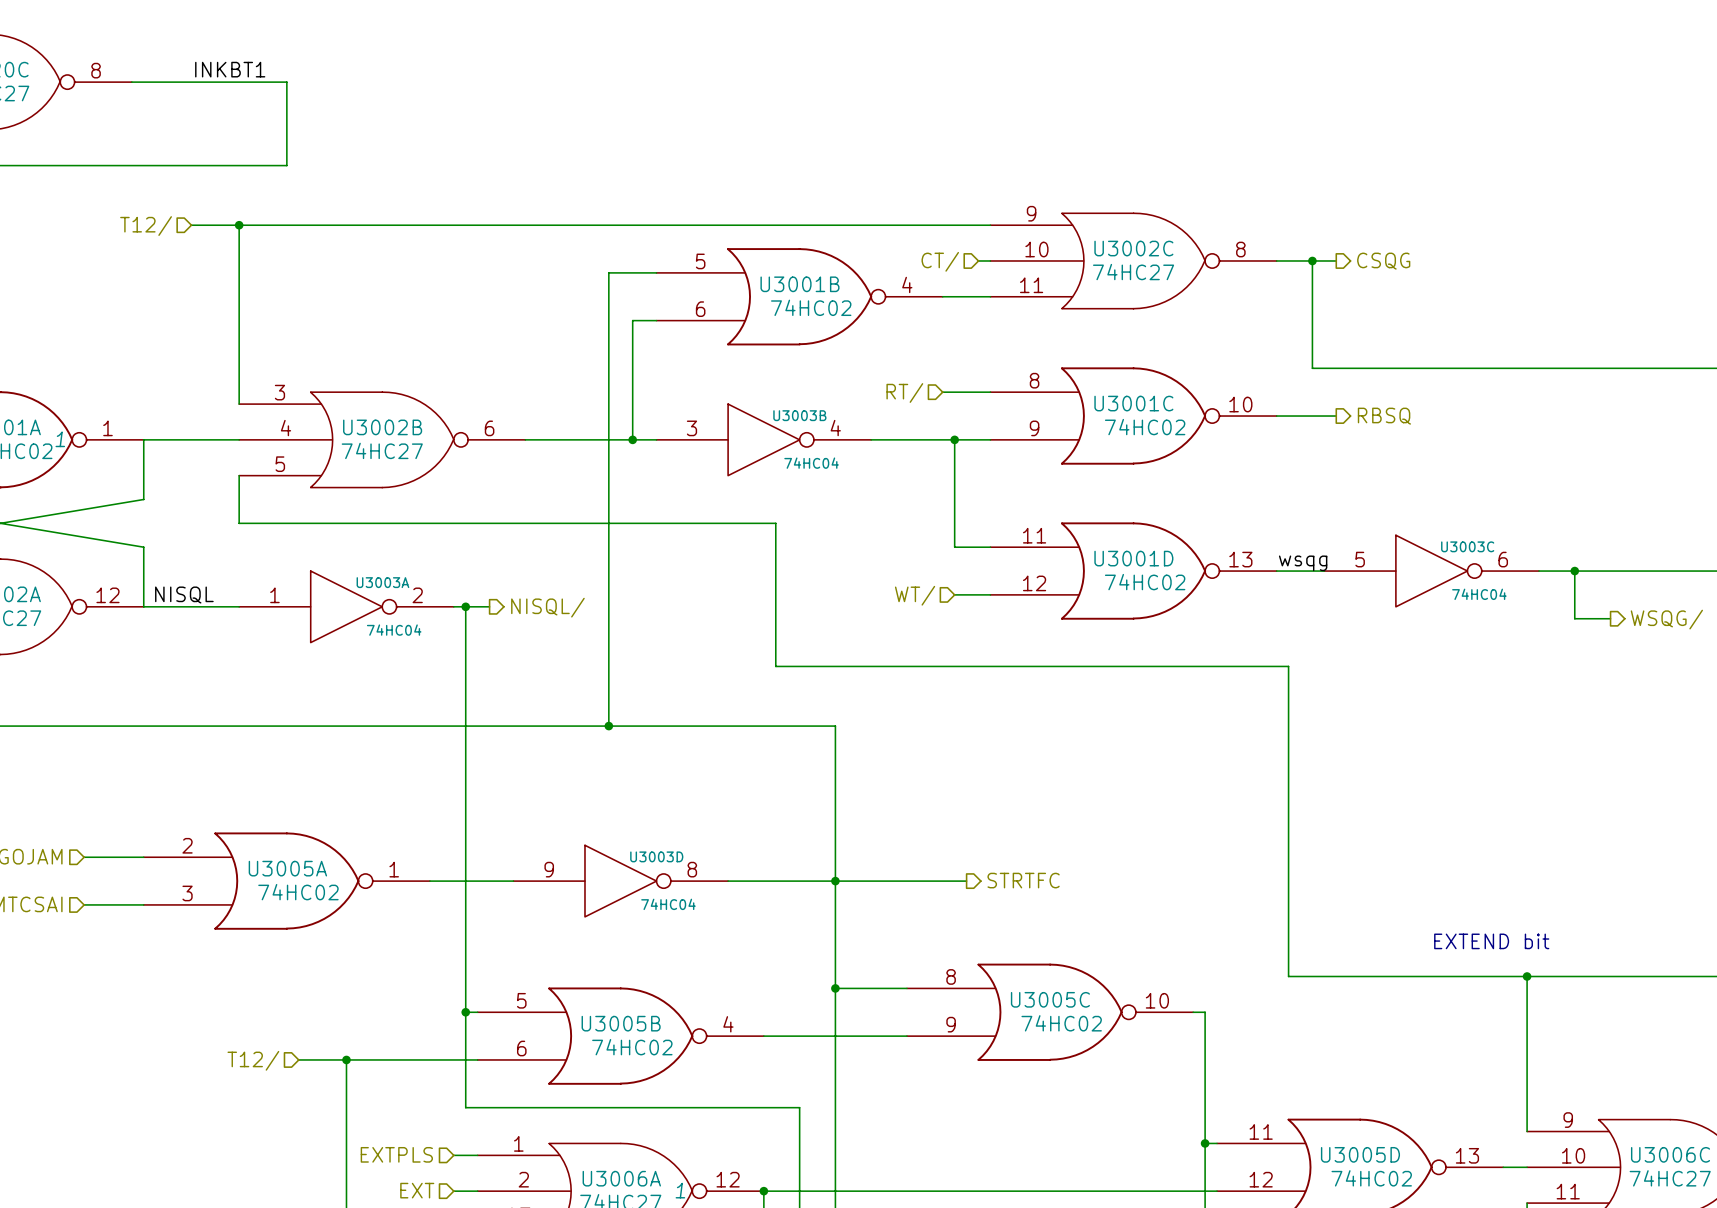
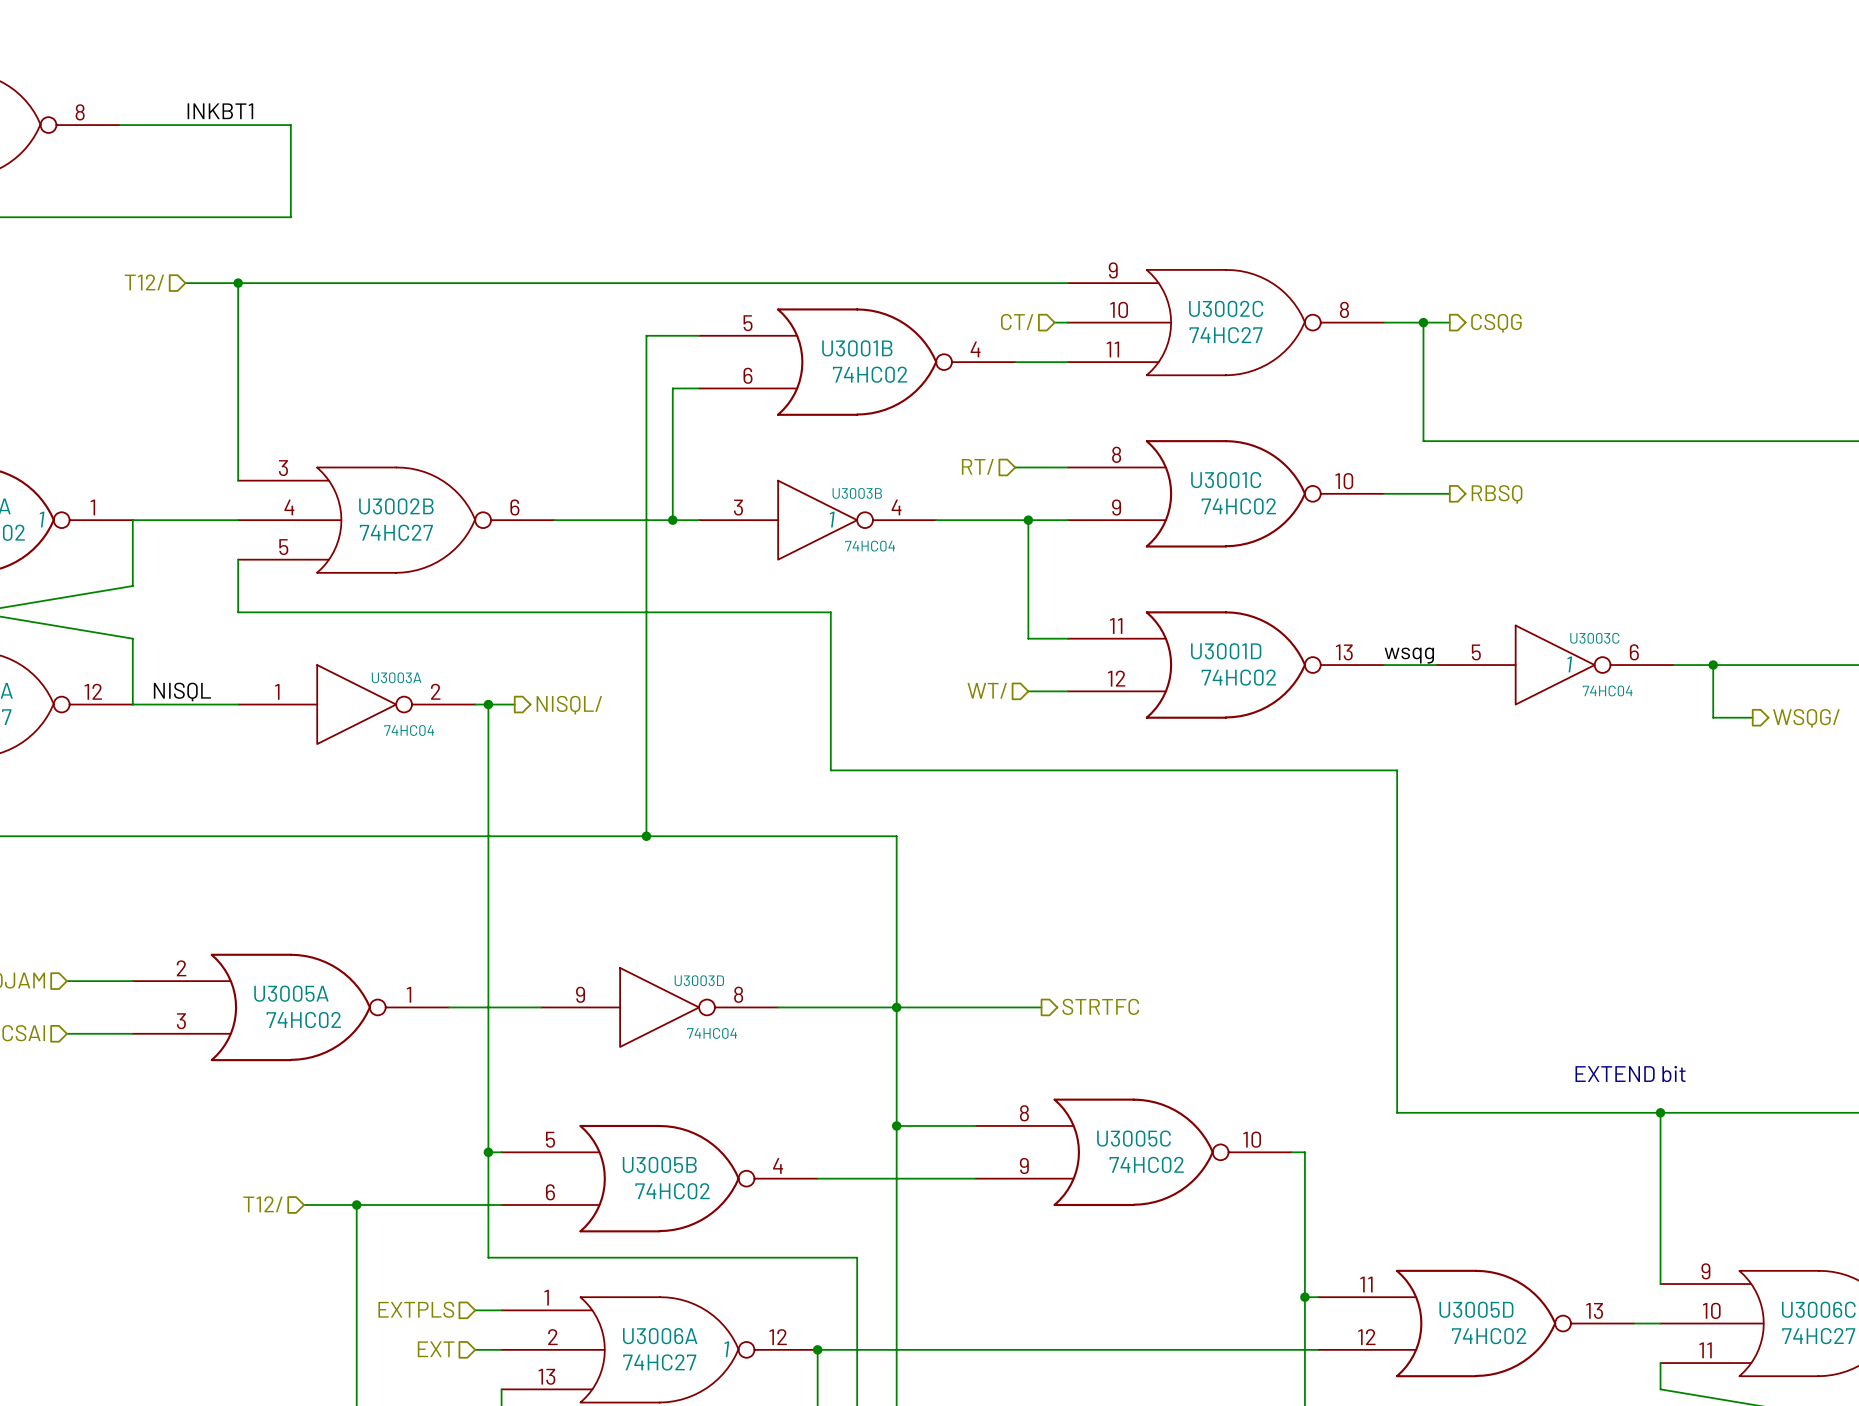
U3003B text: none -> 1 (832, 519)
U3003C text: none -> 1 (1569, 664)

